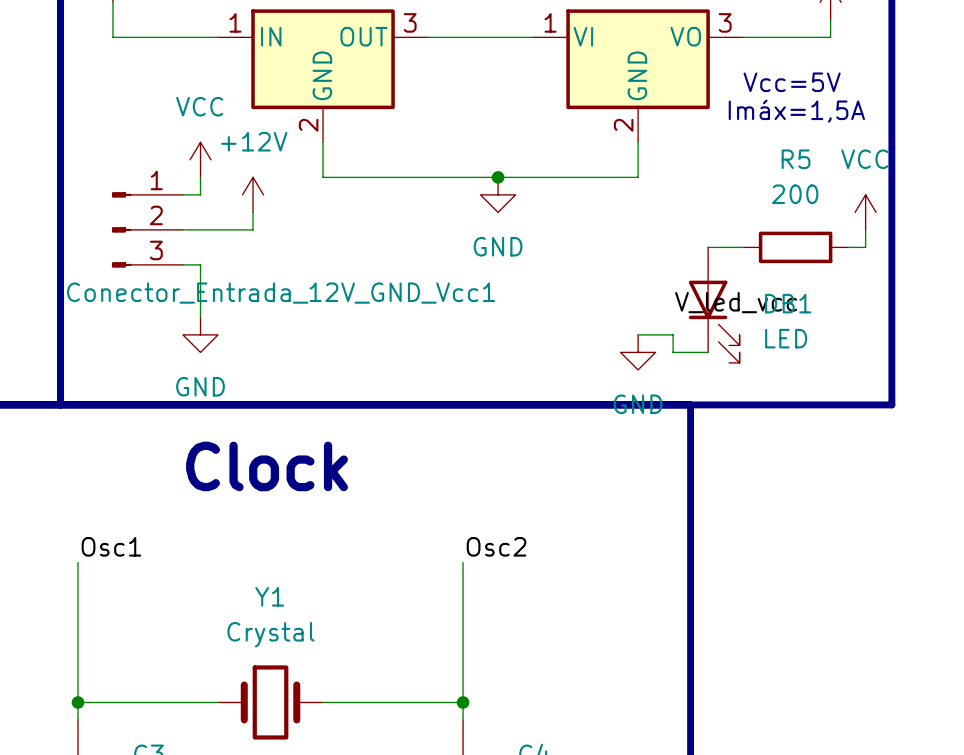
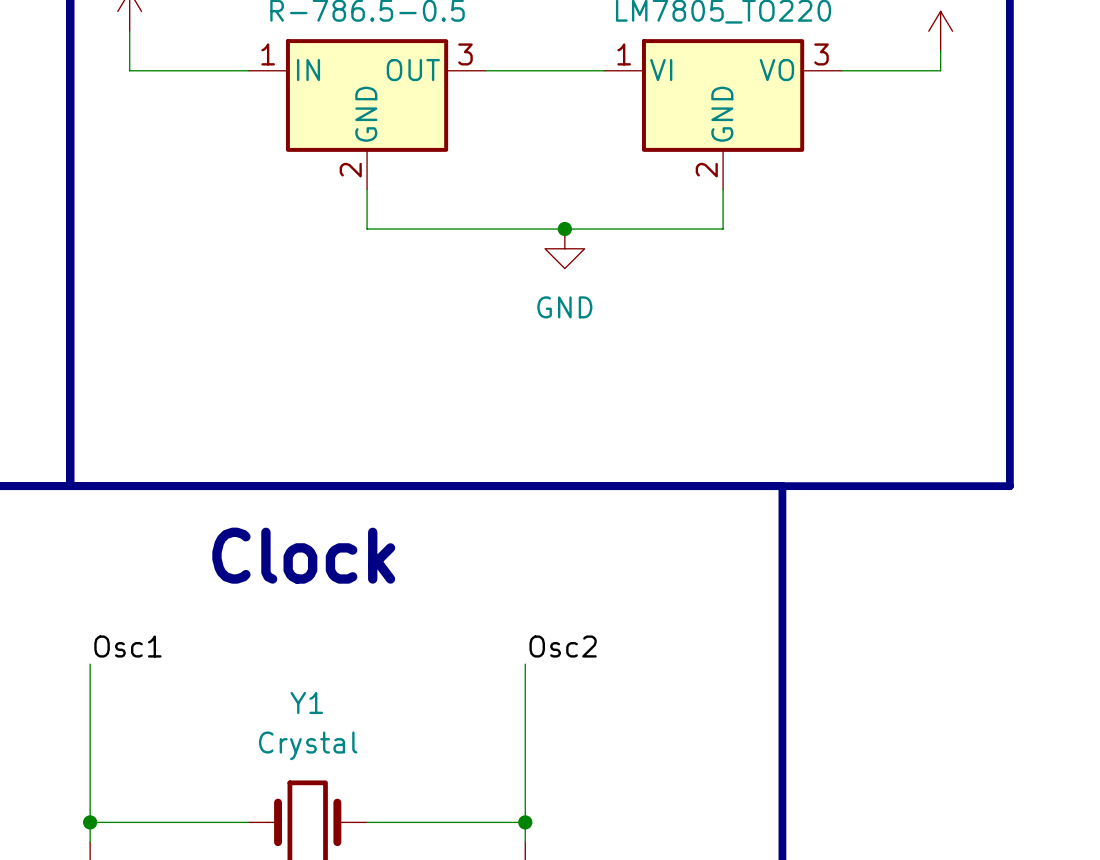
text: Vcc=5V (792, 82) -> none
text: Imáx=1,5A (796, 111) -> none
power symbol: VCC (200, 159) -> none
wire: (200, 177) (200, 194) (183, 194) -> none
power symbol: +12V (253, 194) -> none
wire: (253, 212) (253, 229) (183, 229) -> none
power symbol: VCC (865, 212) -> none
Conector_Entrada_12V_GND_Vcc1: (147, 229) -> none
wire: (865, 229) (865, 247) (848, 247) -> none
wire: (708, 247) (743, 247) -> none
R5: 200 (795, 247) -> none
wire: (183, 264) (200, 264) (200, 317) -> none
label: V_led_vcc (736, 302) -> none
DB1: LED (714, 305) -> none
power symbol: GND (200, 334) -> none
wire: (638, 334) (673, 334) (673, 352) (708, 352) -> none
power symbol: GND (638, 352) -> none

